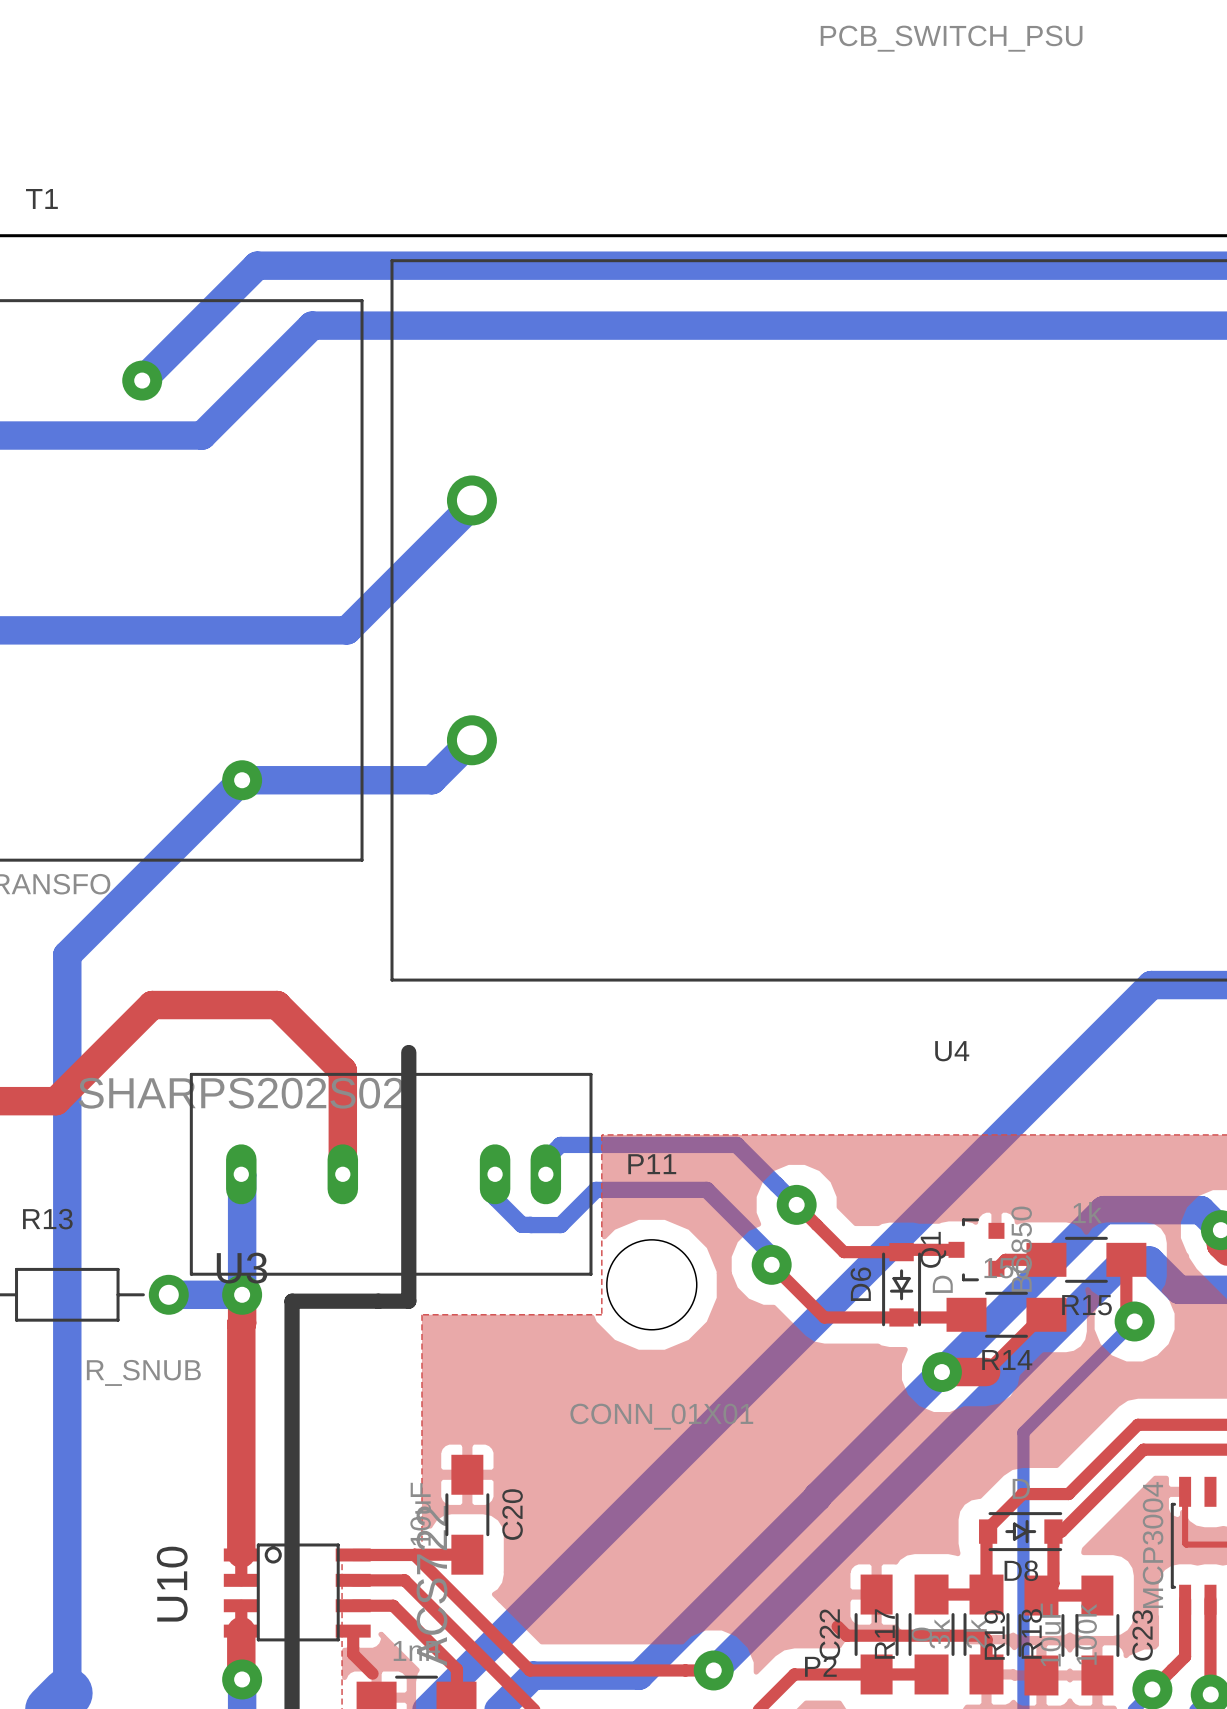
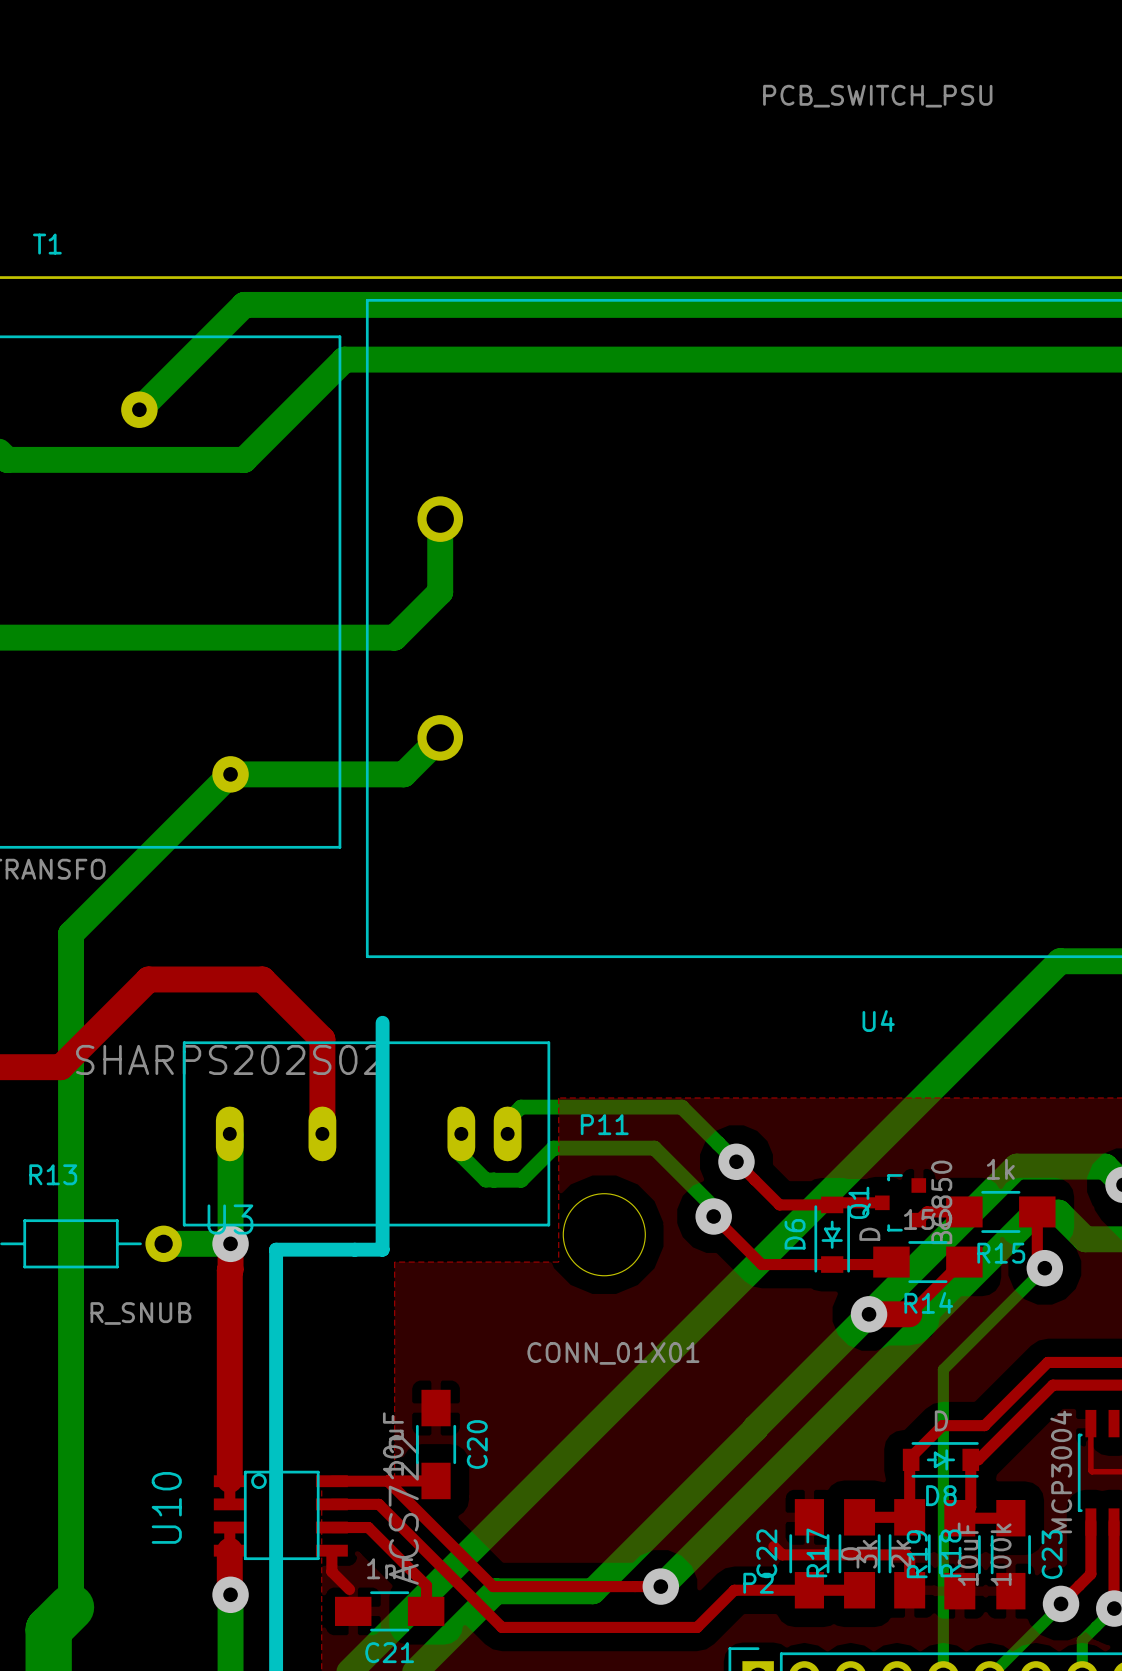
bottom track: (367, 325) (312, 325) (202, 435) -> (344, 359) (244, 459) (194, 459)
bottom track: (471, 505) (347, 630) -> (440, 523) (440, 592) (394, 637) (326, 637)

